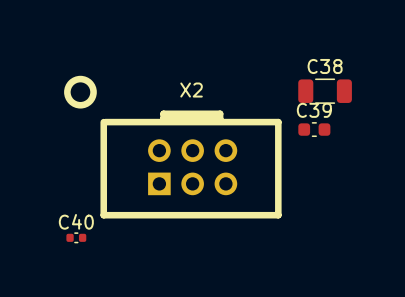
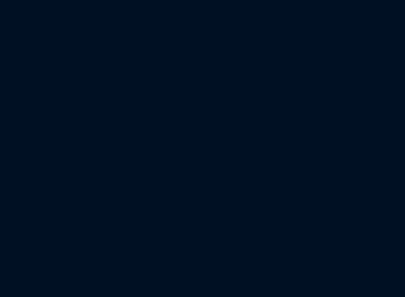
C38: (325, 91) -> none
C39: (314, 129) -> none
X2: (172, 147) -> none
C40: (76, 237) -> none

